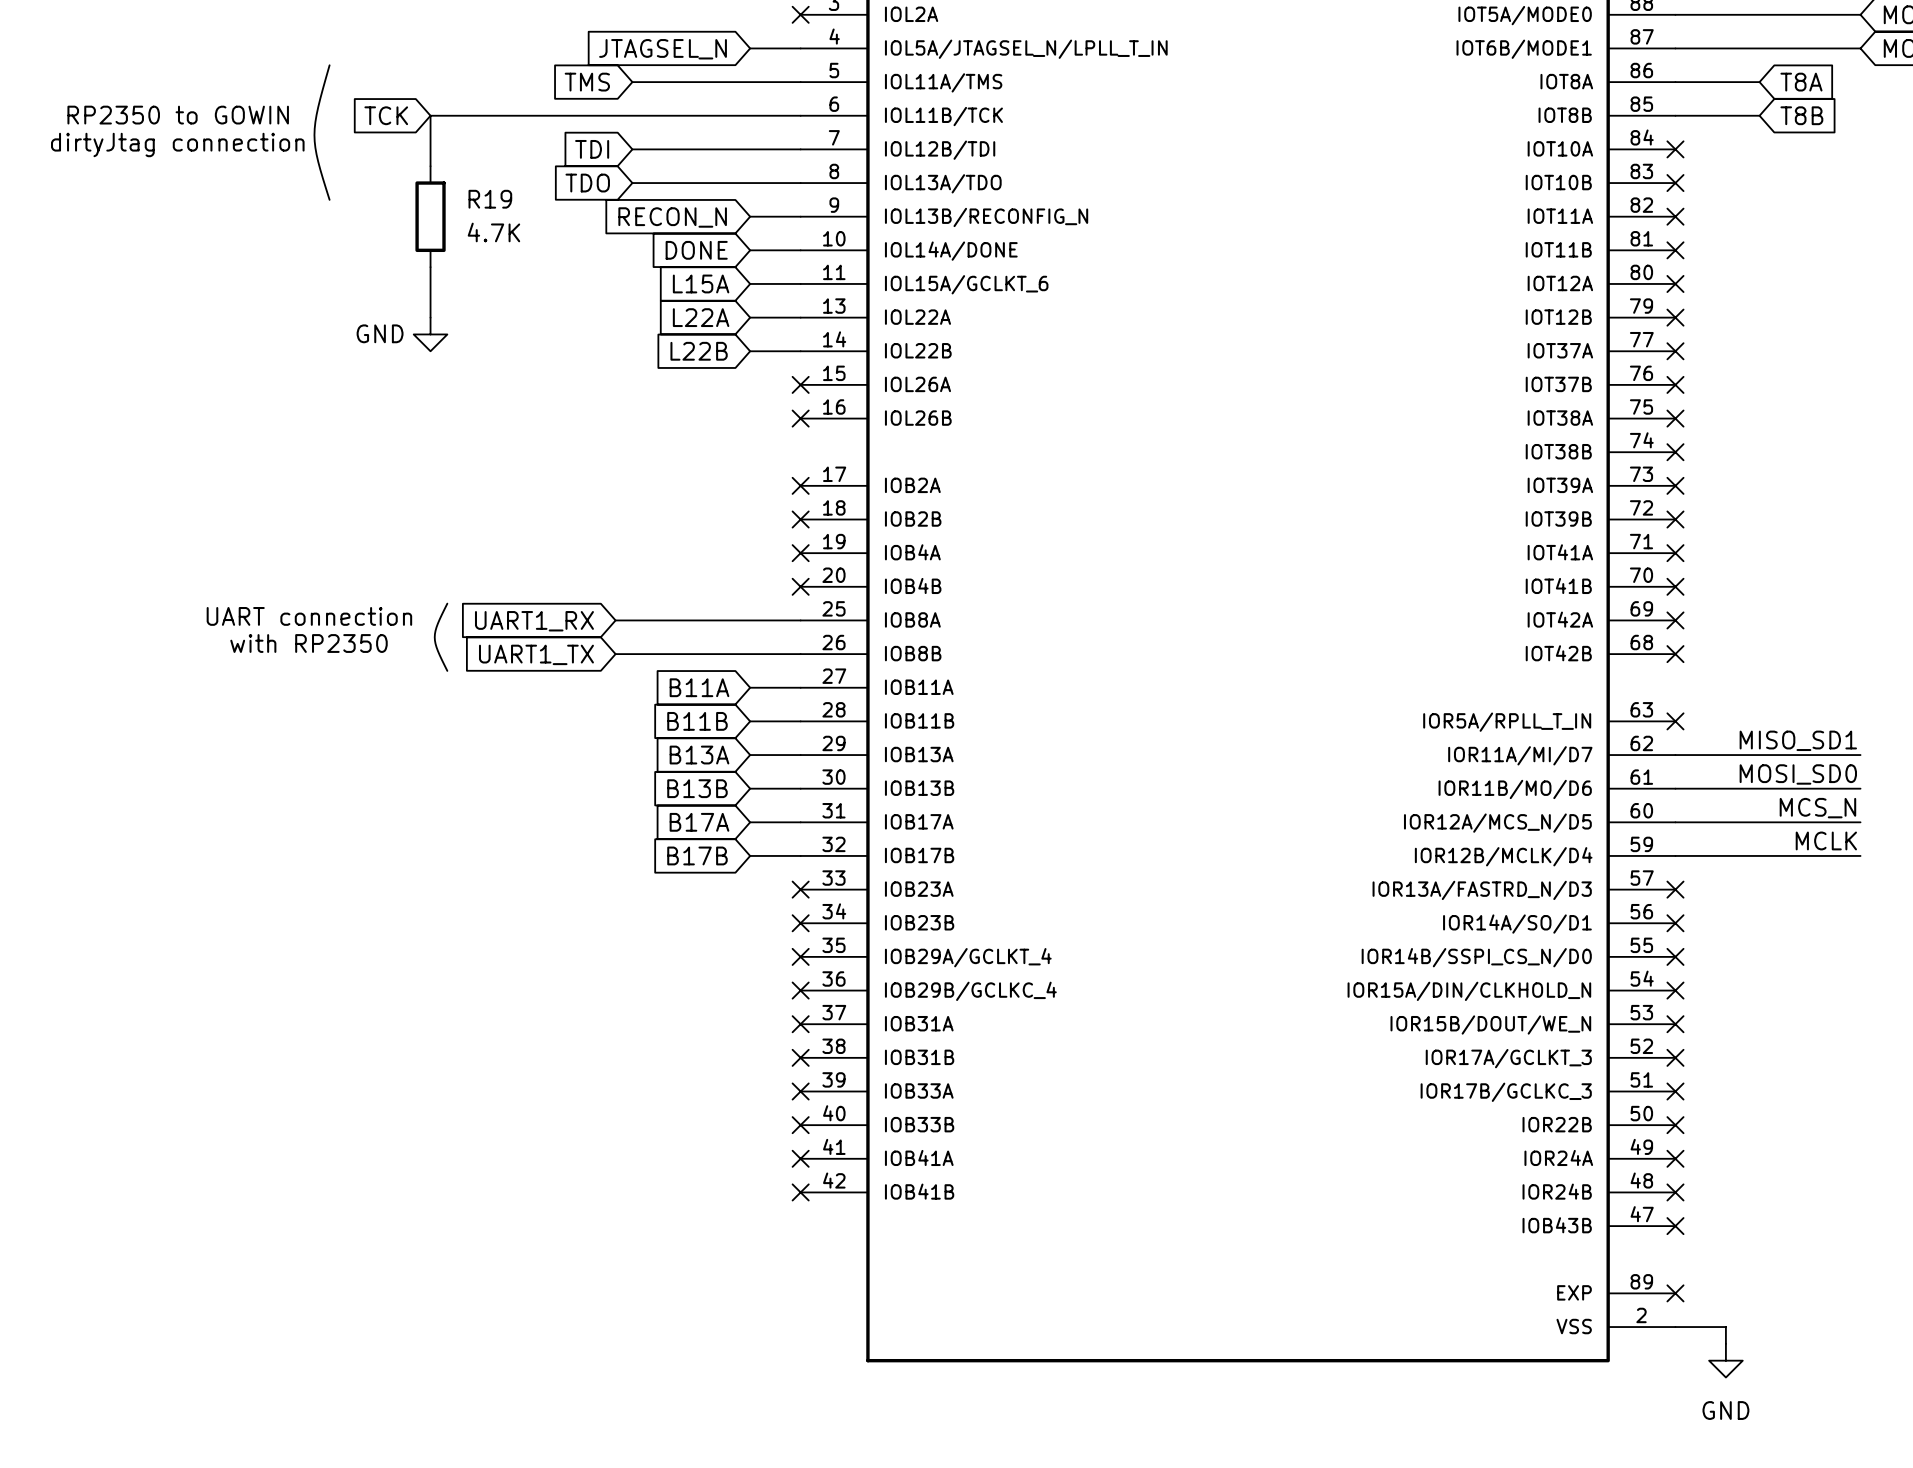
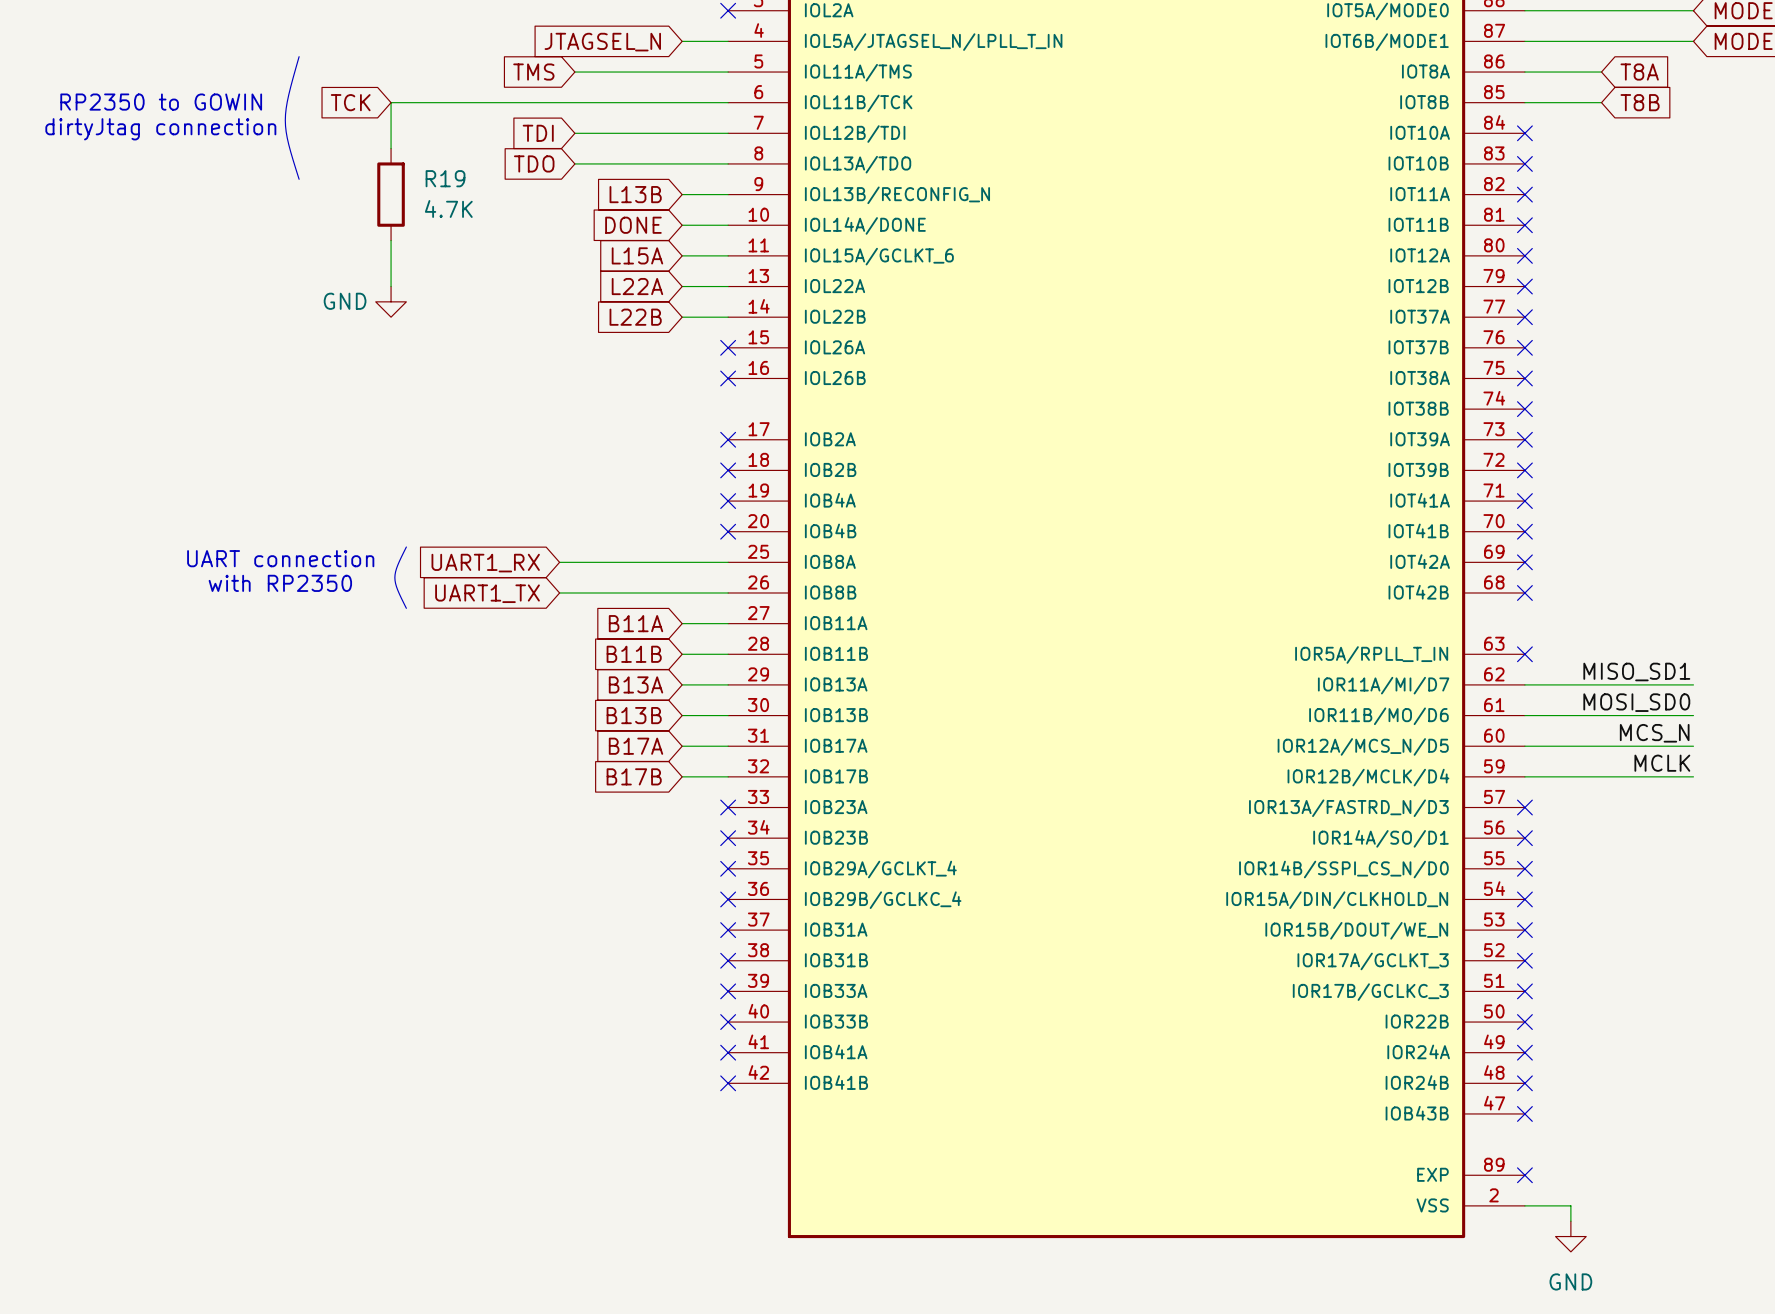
global label: RECON_N (672, 217) -> L13B (635, 194)

